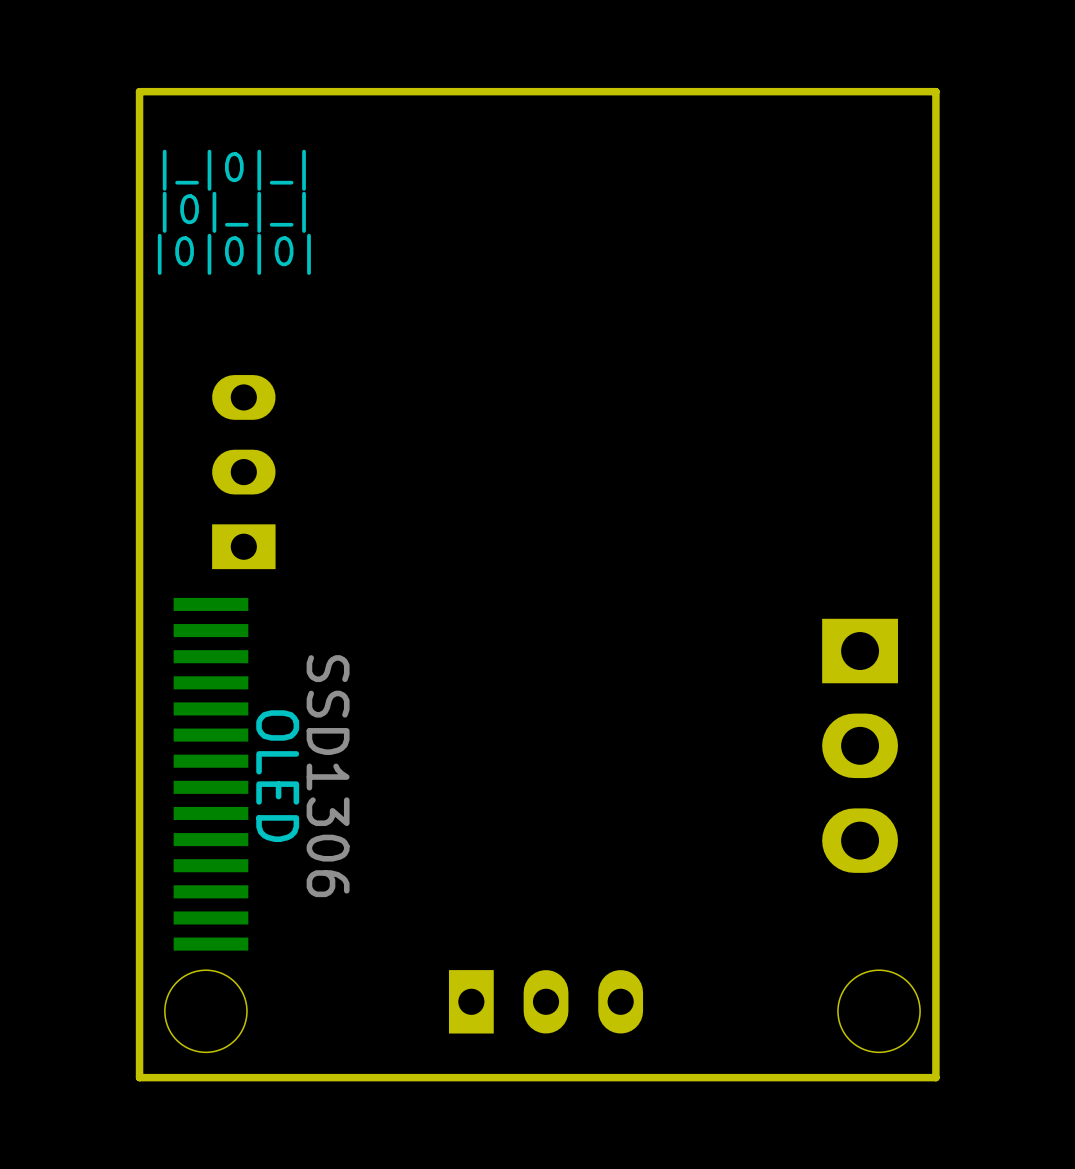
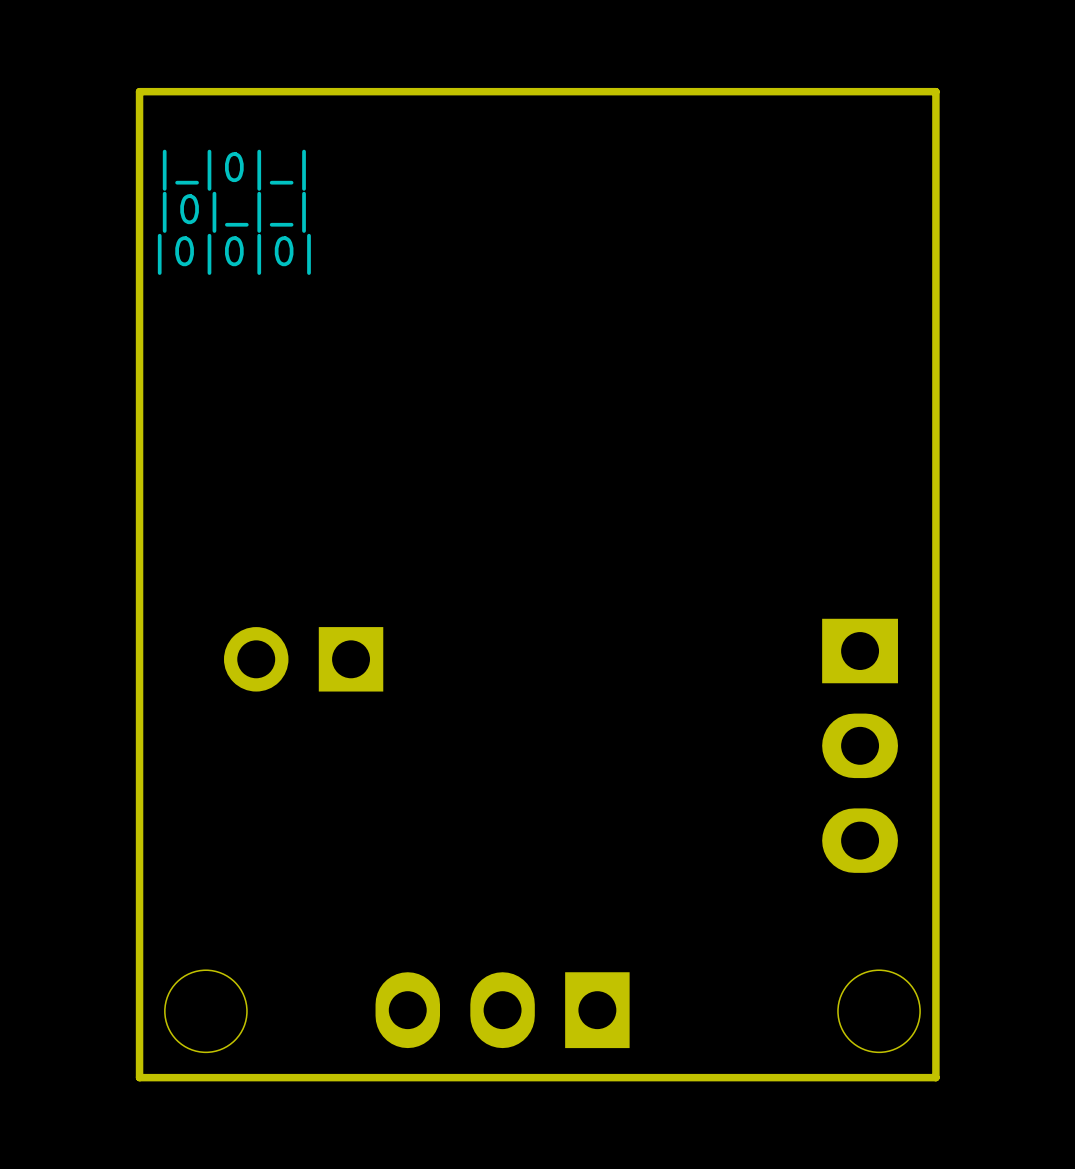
part: (243, 472) -> none
part: none -> (303, 659)
OLED: SSD1306 (210, 774) -> none
part: (546, 1001) -> none
part: none -> (502, 1010)

